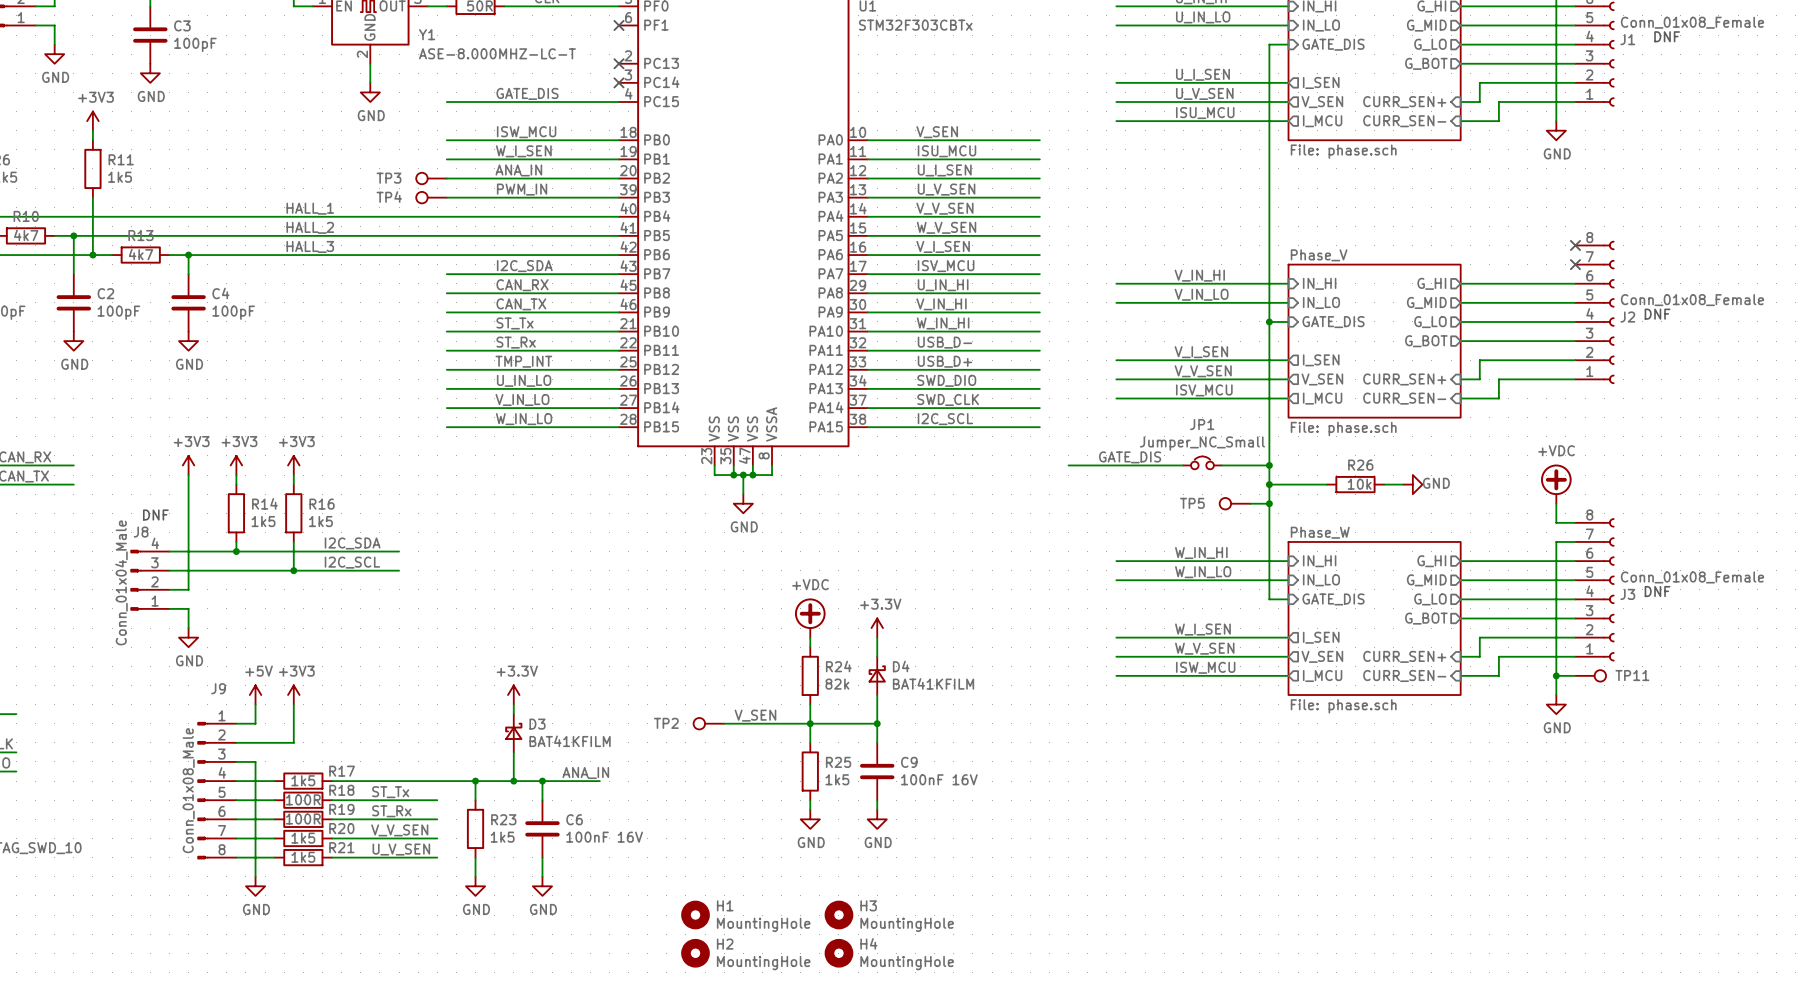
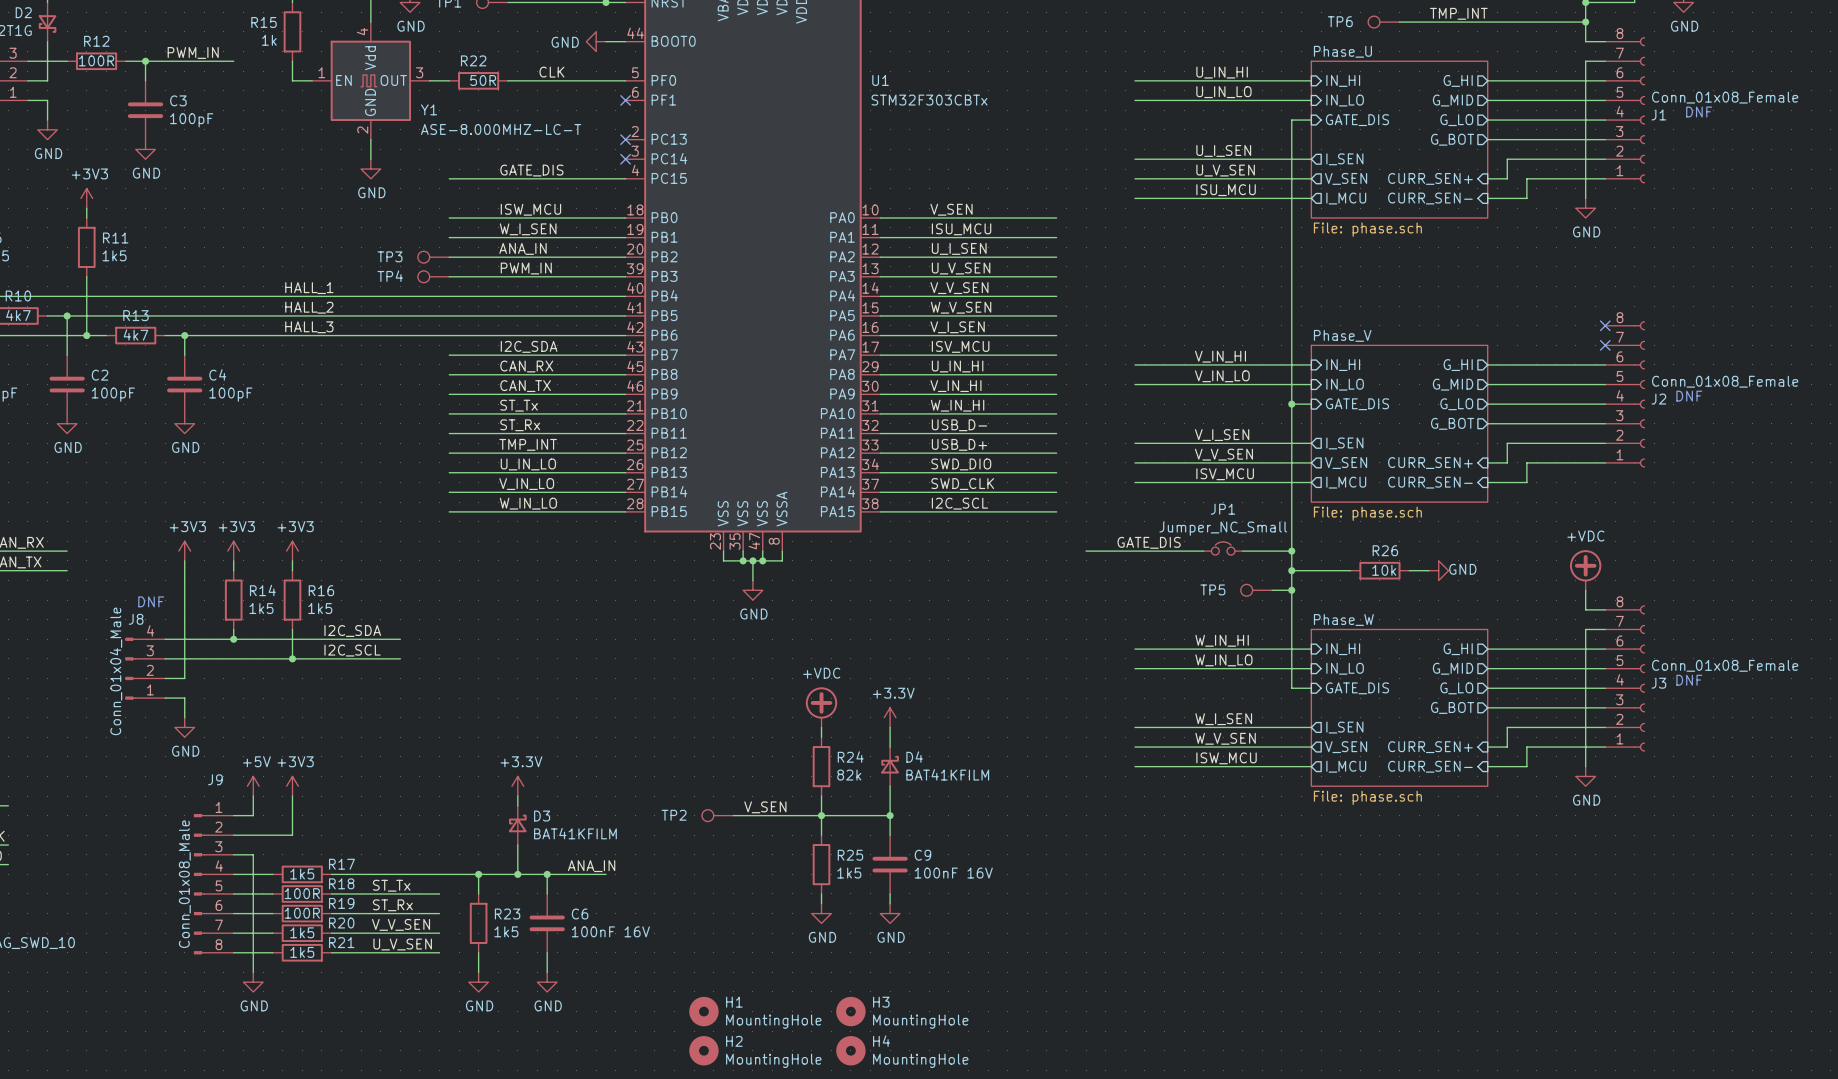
junction: (1556, 675) -> none
wire: (1575, 675) (1556, 675) (1556, 695) -> none
TP11: (1590, 675) -> none
power symbol position: GND (1556, 704) -> GND (1585, 776)

